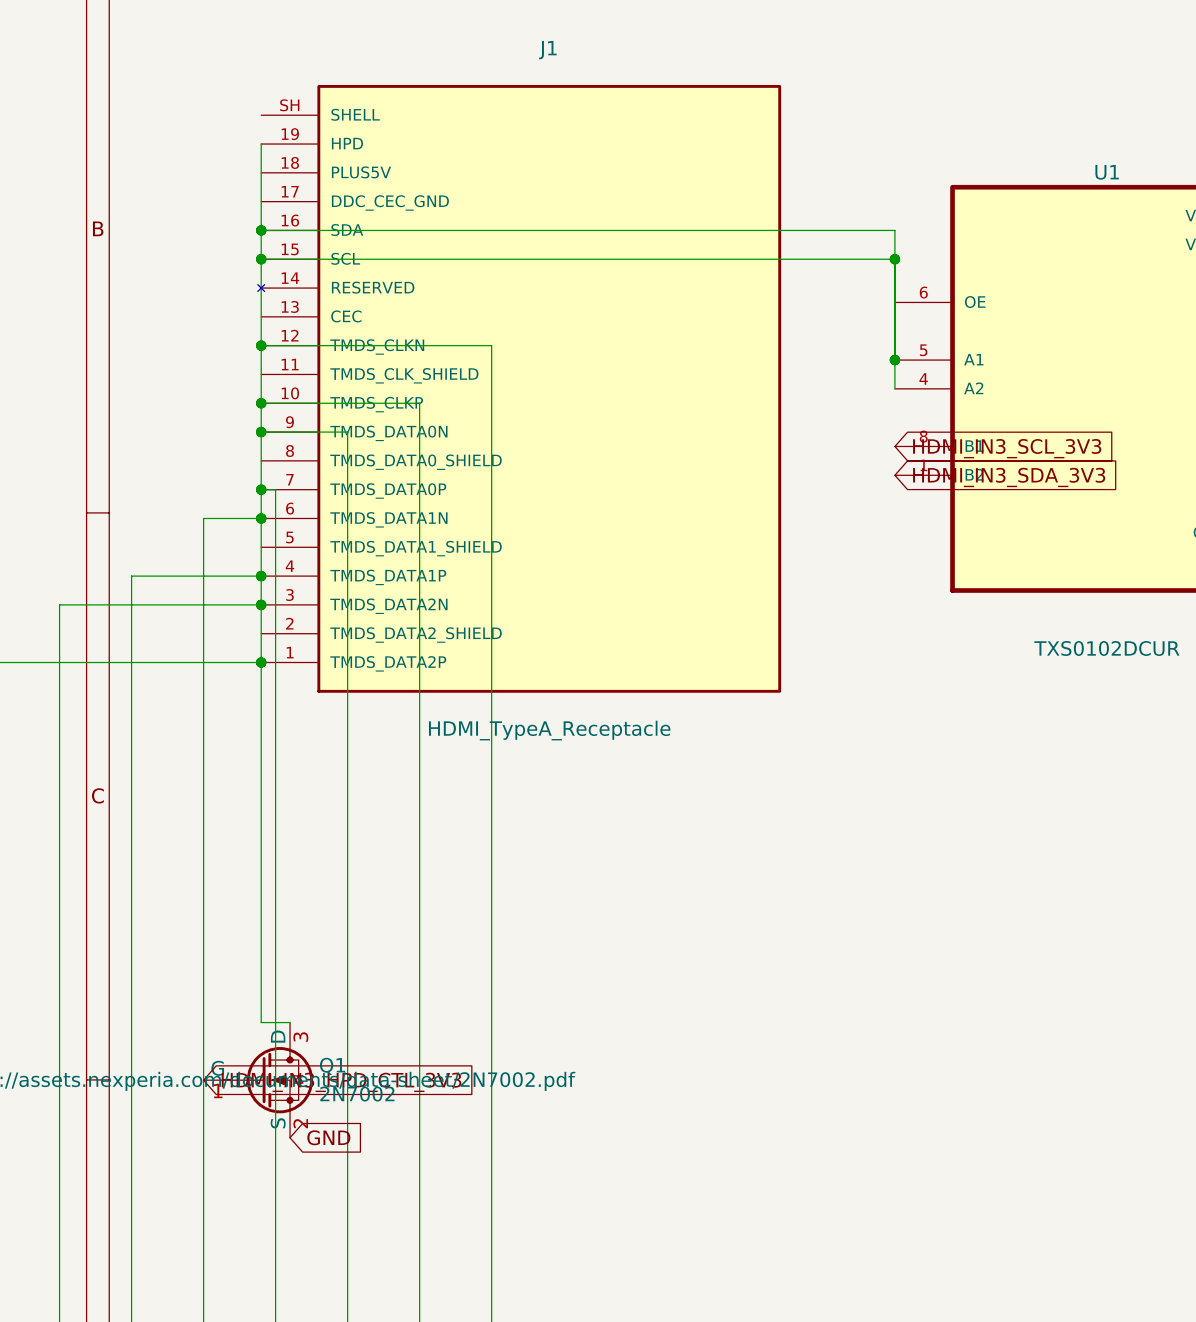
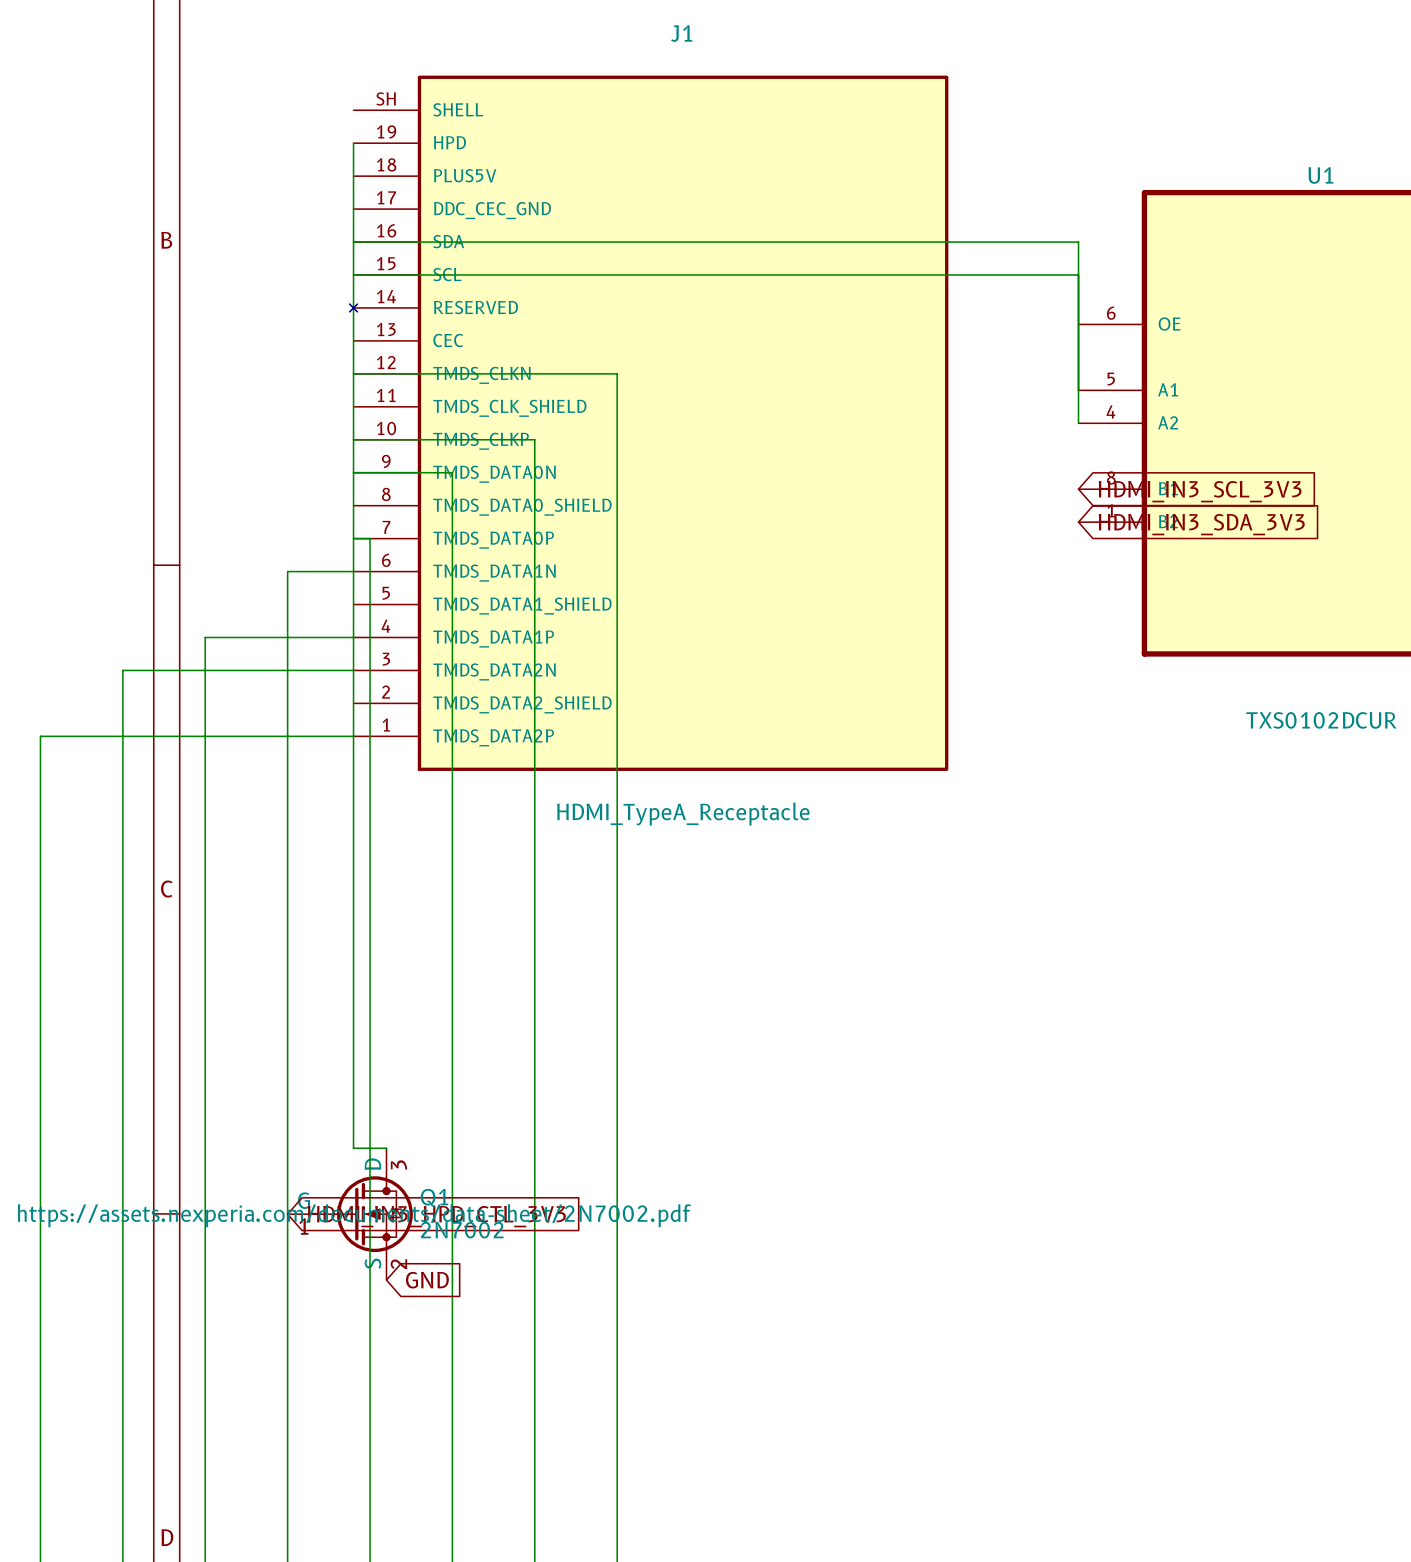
junction: (261, 230) -> none
junction: (261, 259) -> none
junction: (894, 259) -> none
junction: (261, 345) -> none
junction: (894, 360) -> none
junction: (261, 403) -> none
junction: (261, 432) -> none
junction: (261, 489) -> none
junction: (261, 518) -> none
junction: (261, 576) -> none
junction: (261, 604) -> none
junction: (261, 662) -> none

